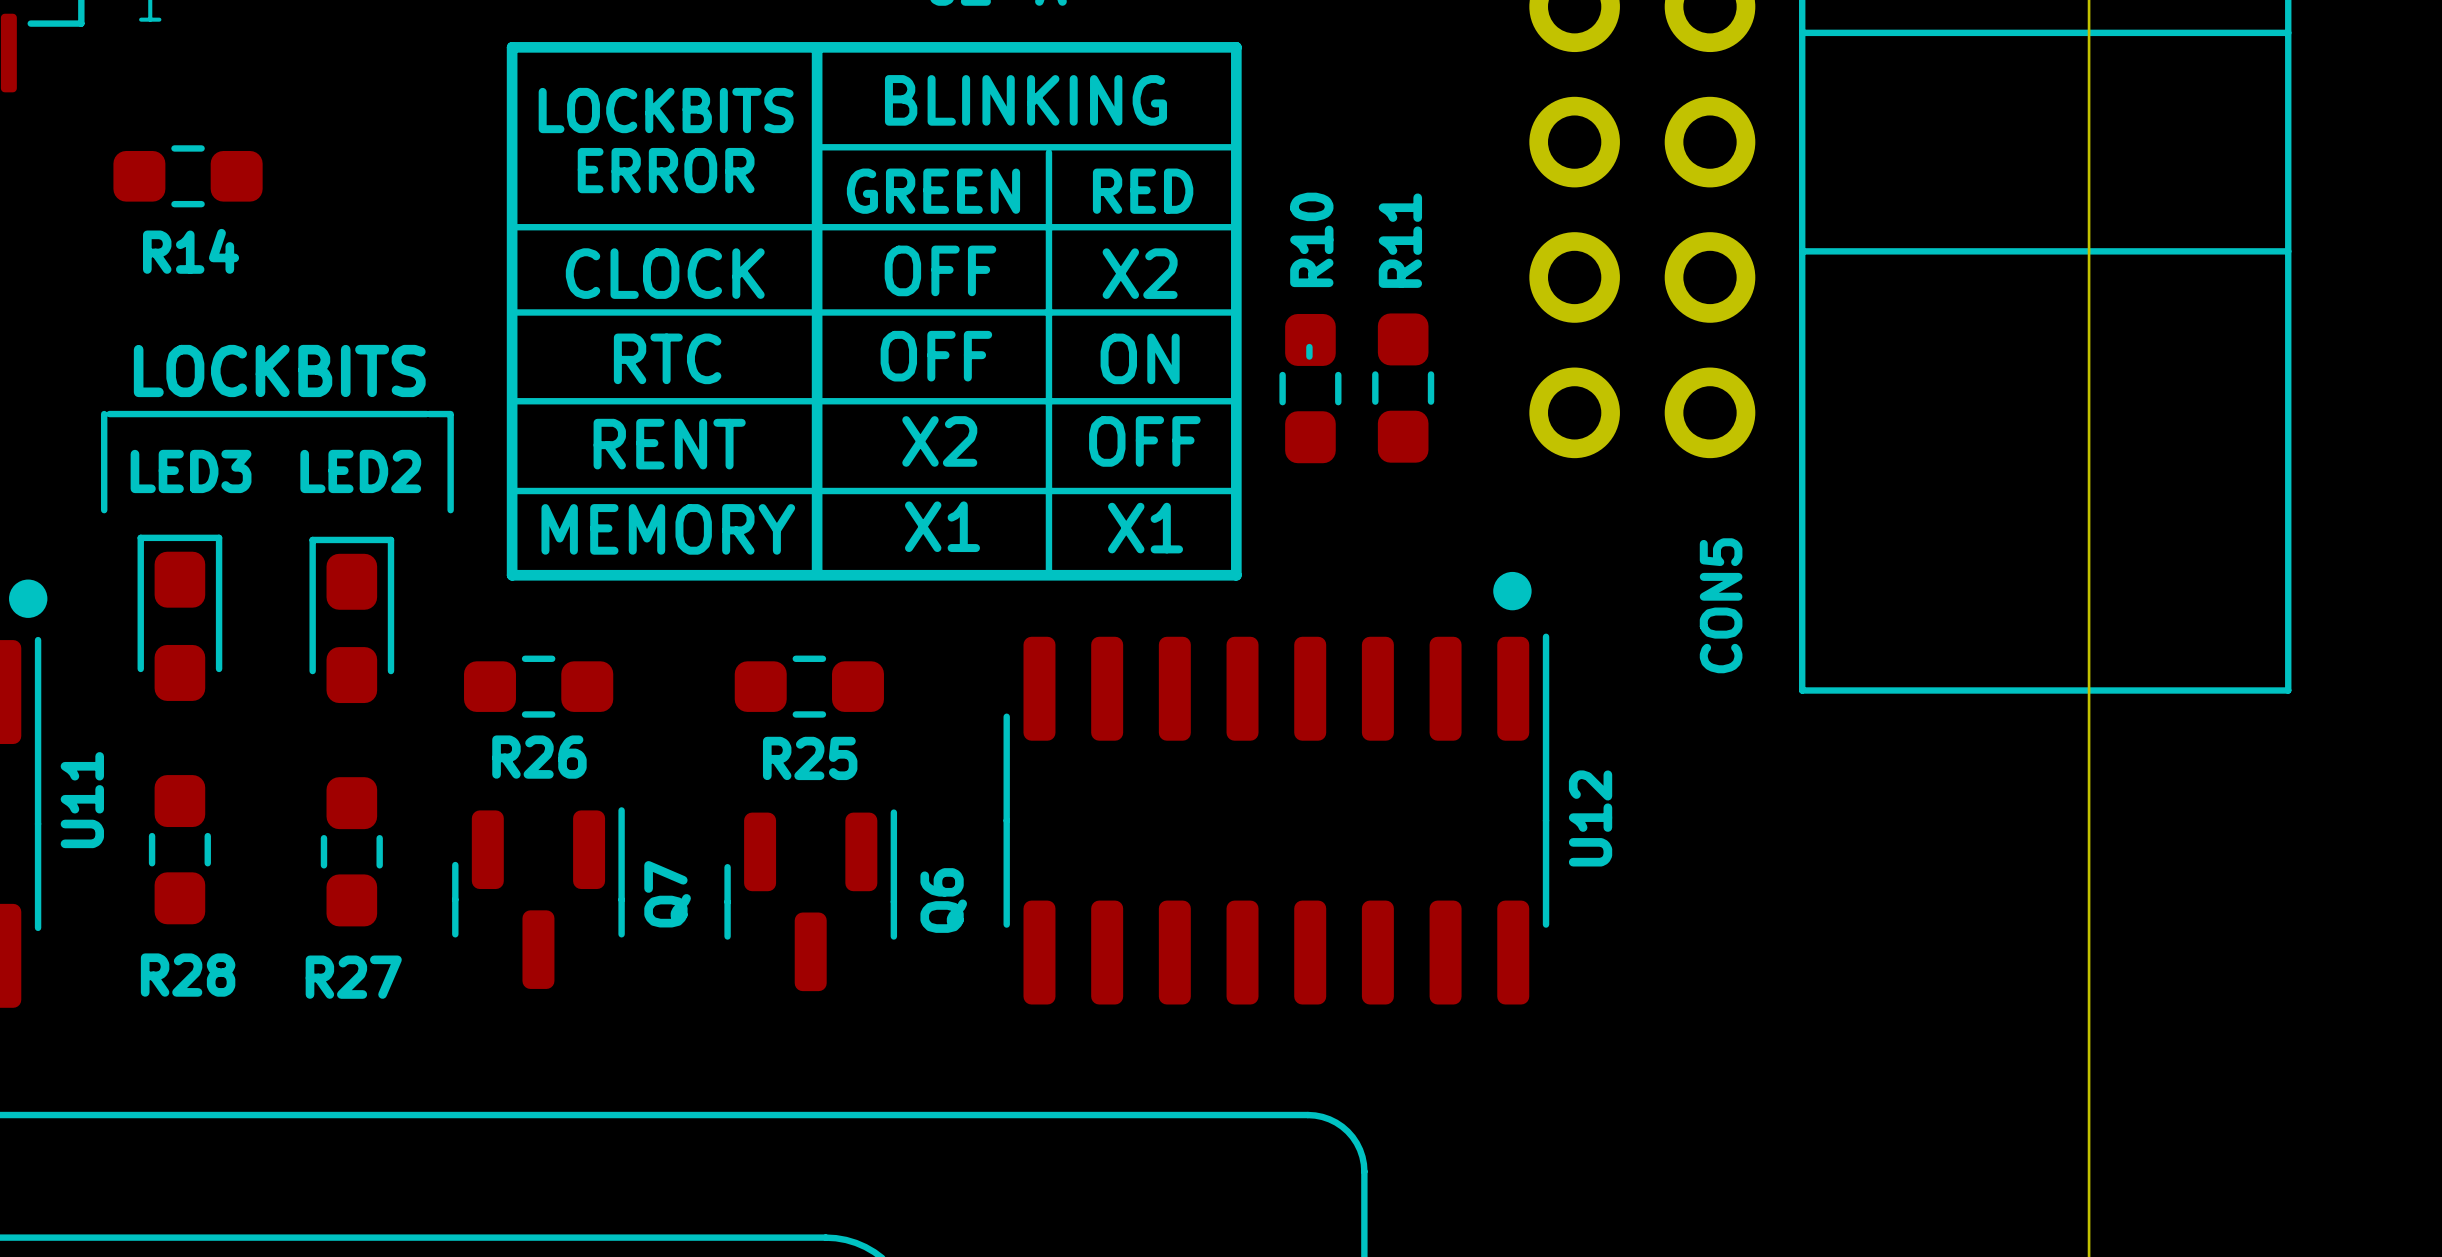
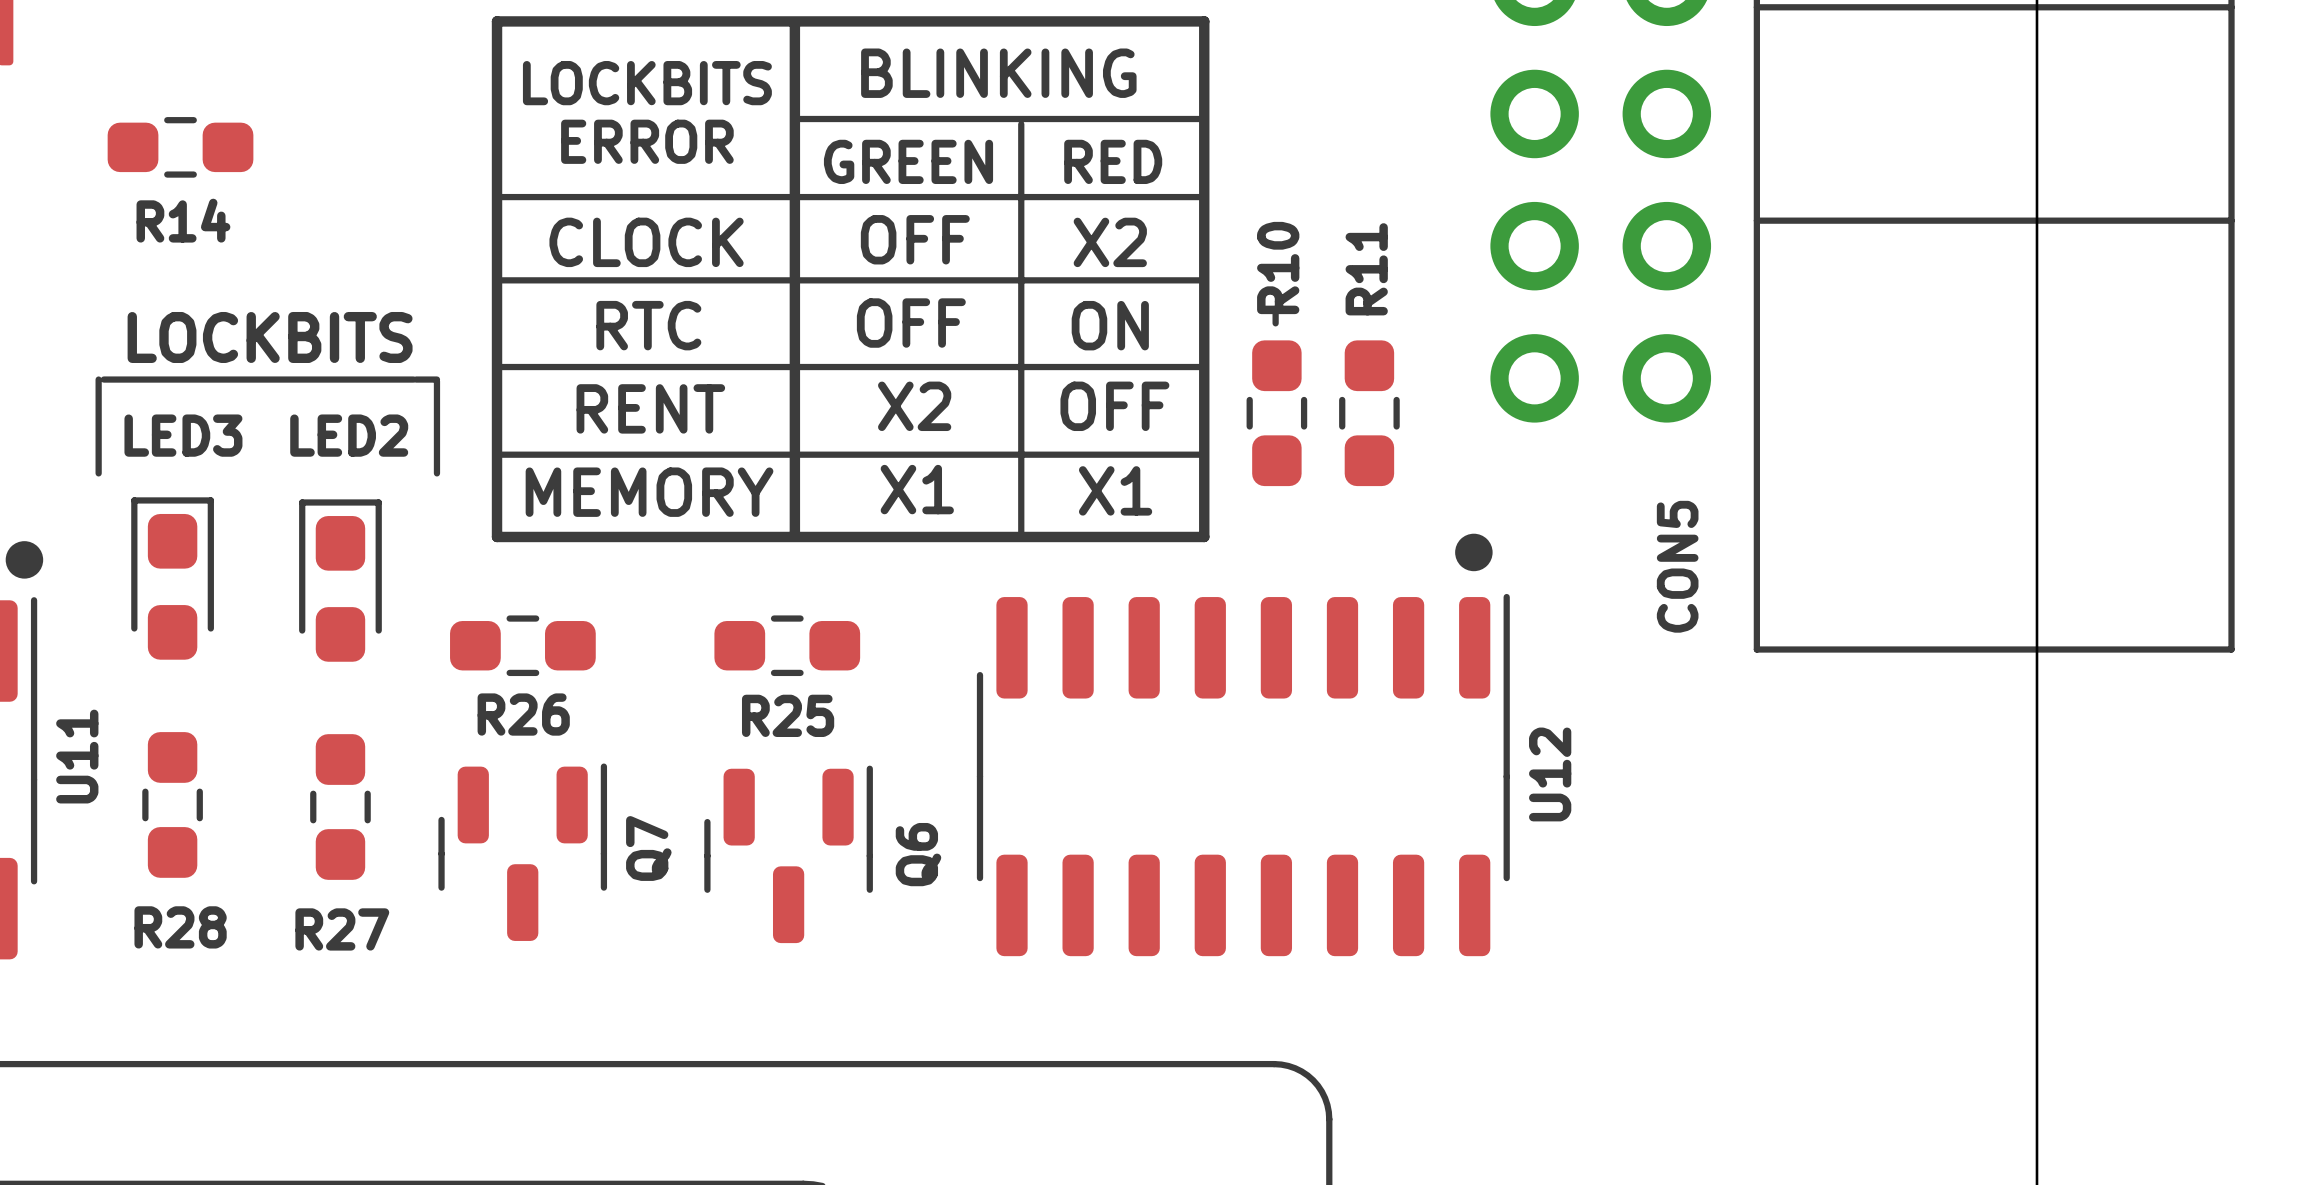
R10 position: (1310, 388) -> (1276, 413)
R11 position: (1403, 388) -> (1369, 413)

